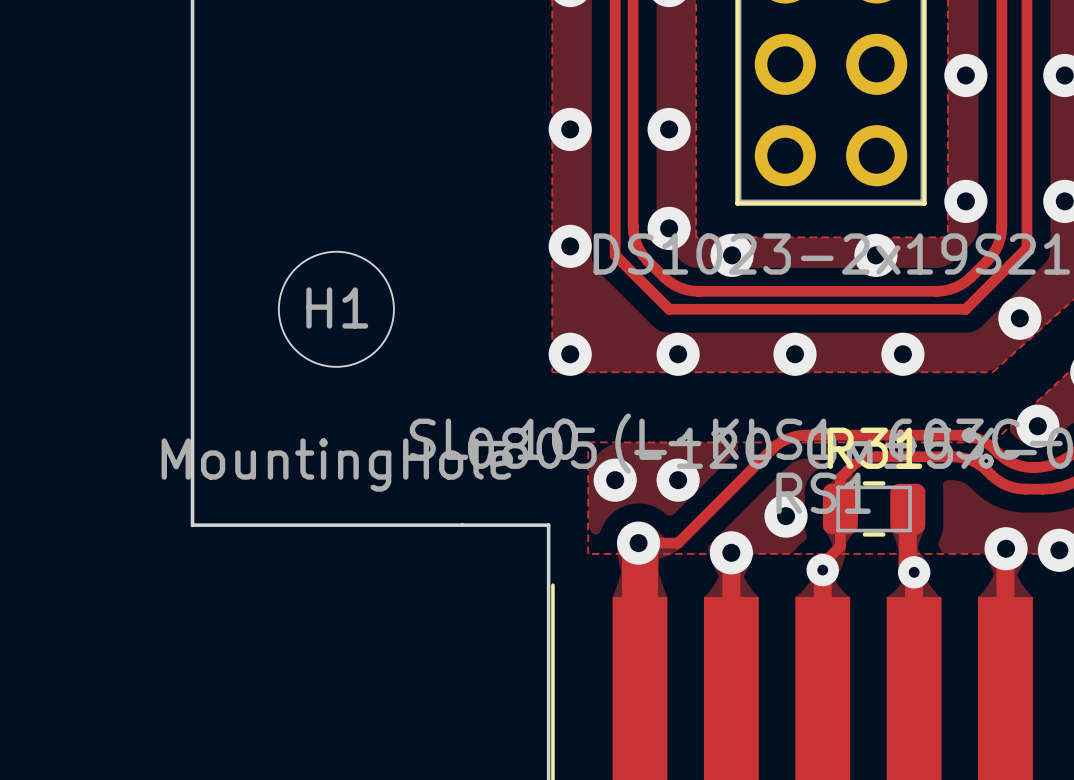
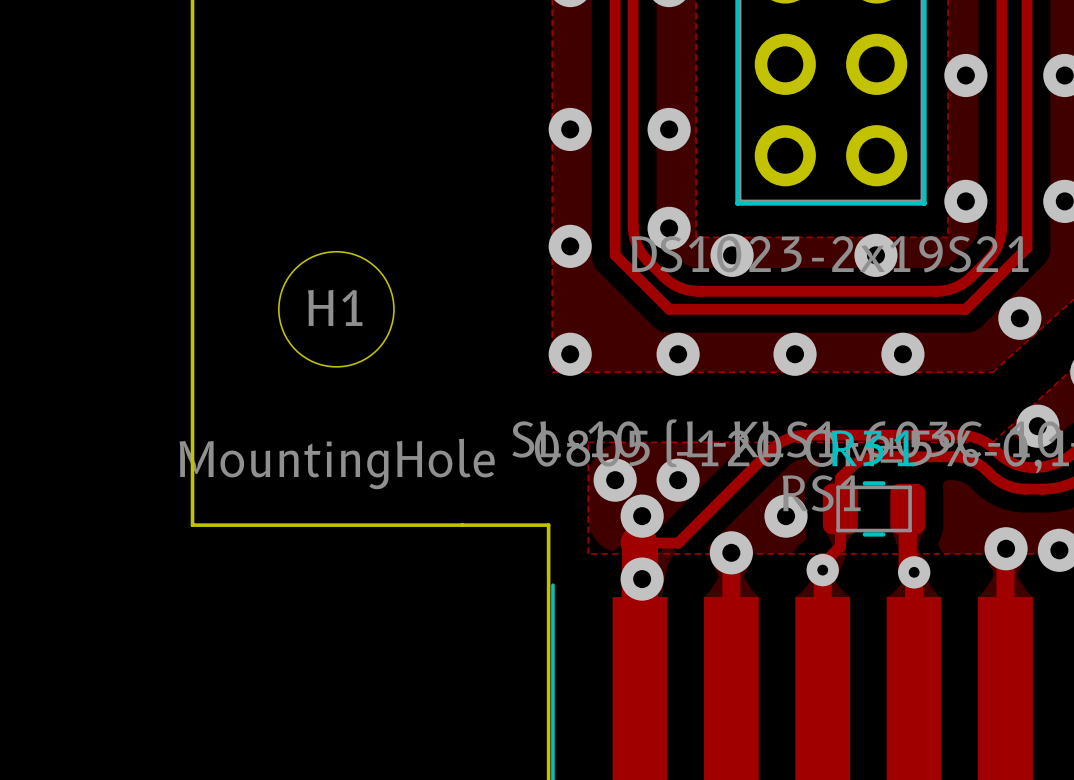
via: none -> (642, 516)
via: (638, 543) -> none
via: none -> (642, 579)

